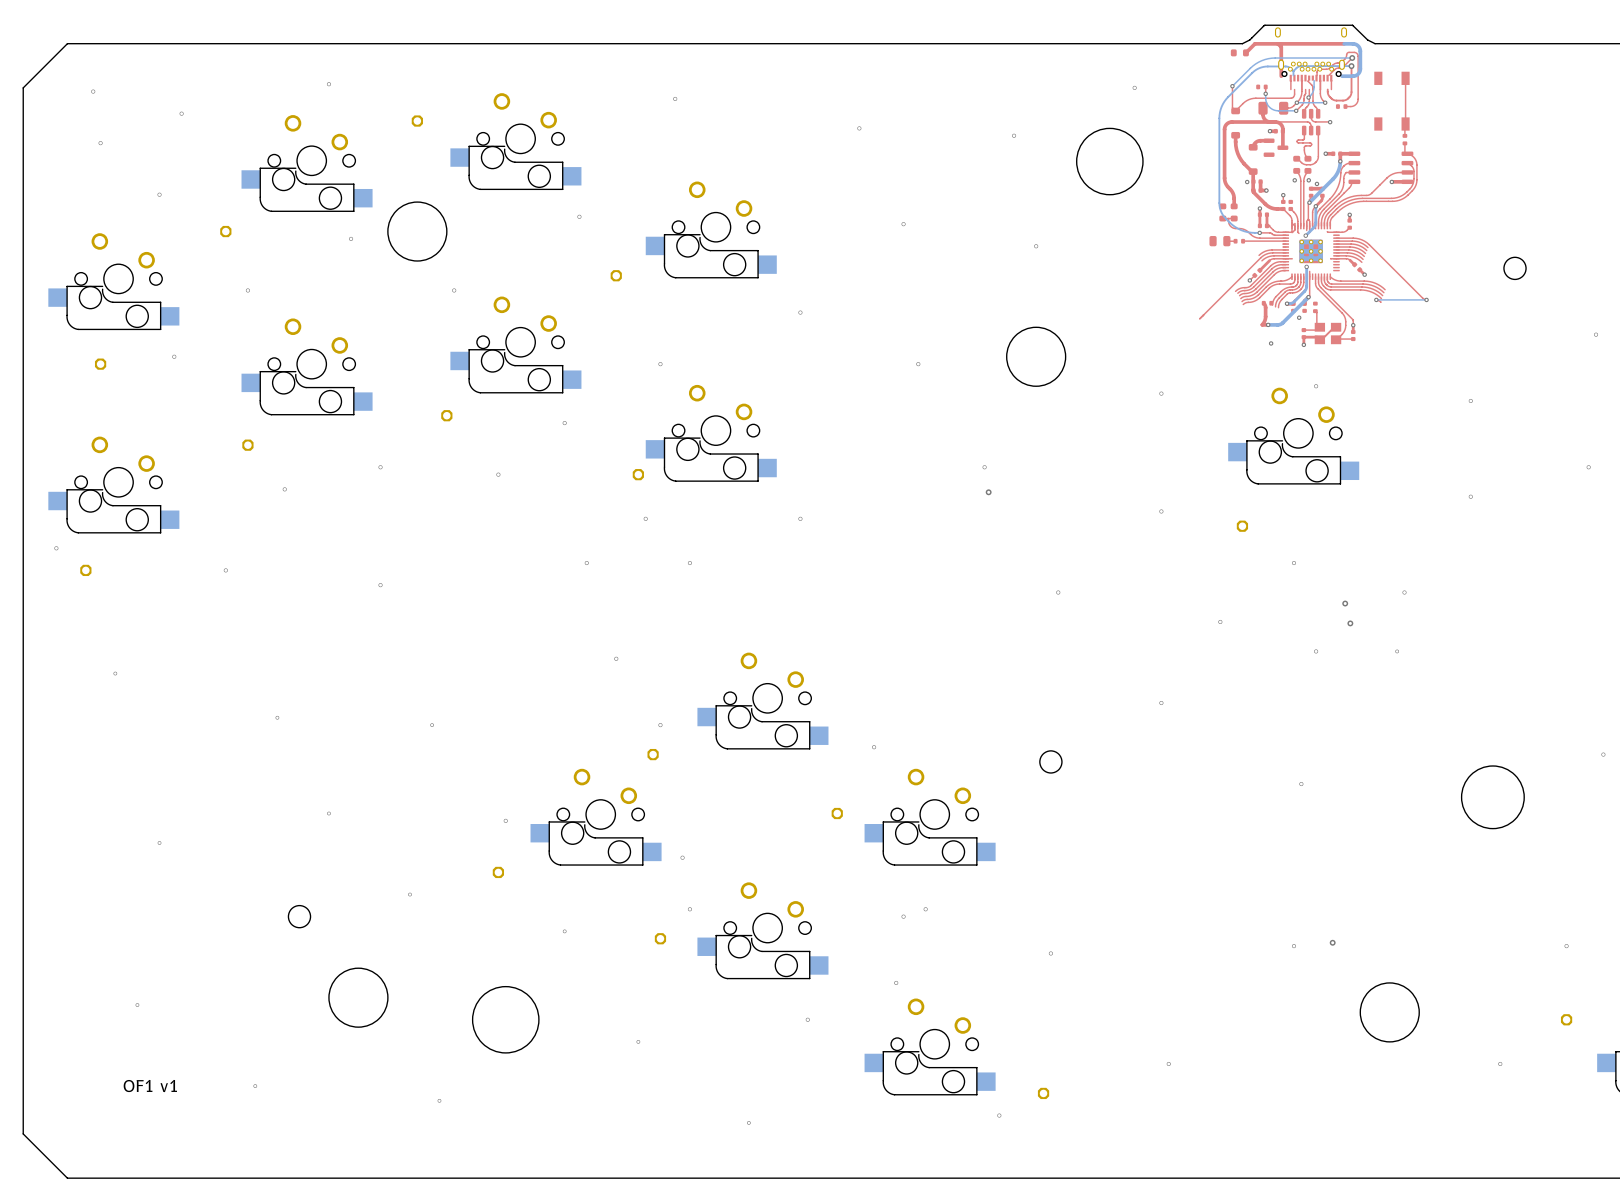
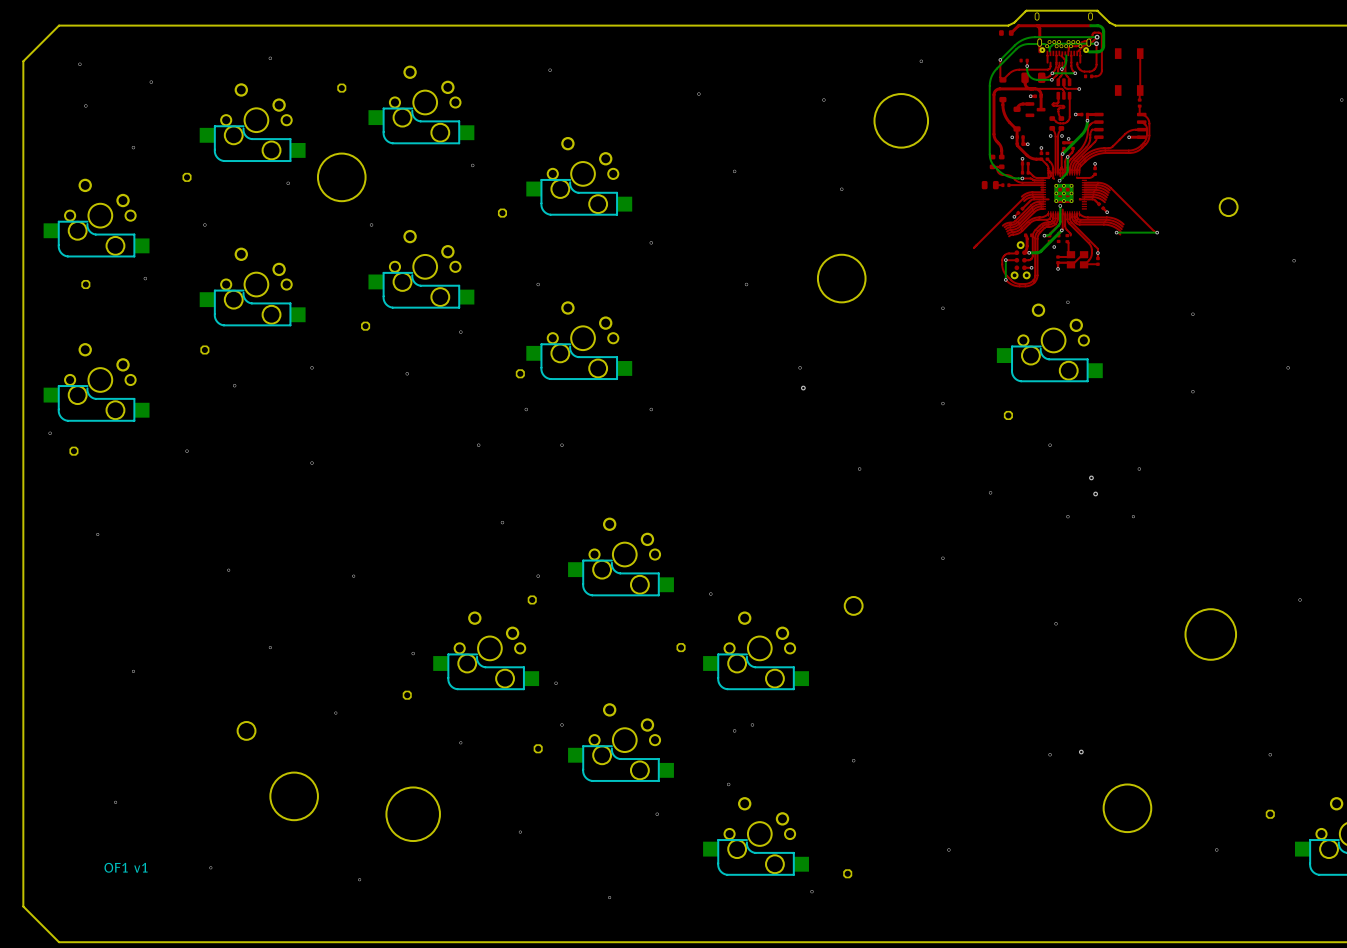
top track: none -> (1065, 213) (1065, 227) (1070, 235)
top track: none -> (1032, 236) (1032, 257) (1030, 259) (1024, 260)
top track: none -> (1035, 238) (1035, 276) (1029, 283) (1014, 282) (1003, 270) (1003, 256) (1007, 253) (1017, 253)
top track: none -> (1037, 238) (1037, 275) (1035, 281) (1028, 285) (1019, 286) (1012, 285) (1005, 279)
top track: none -> (1005, 260) (1016, 260)
bottom track: none -> (1005, 260) (1005, 279)
via: none -> (1005, 260)
part: none -> (1020, 260)
top track: none -> (1031, 267) (1024, 267)
via: none -> (1005, 279)

